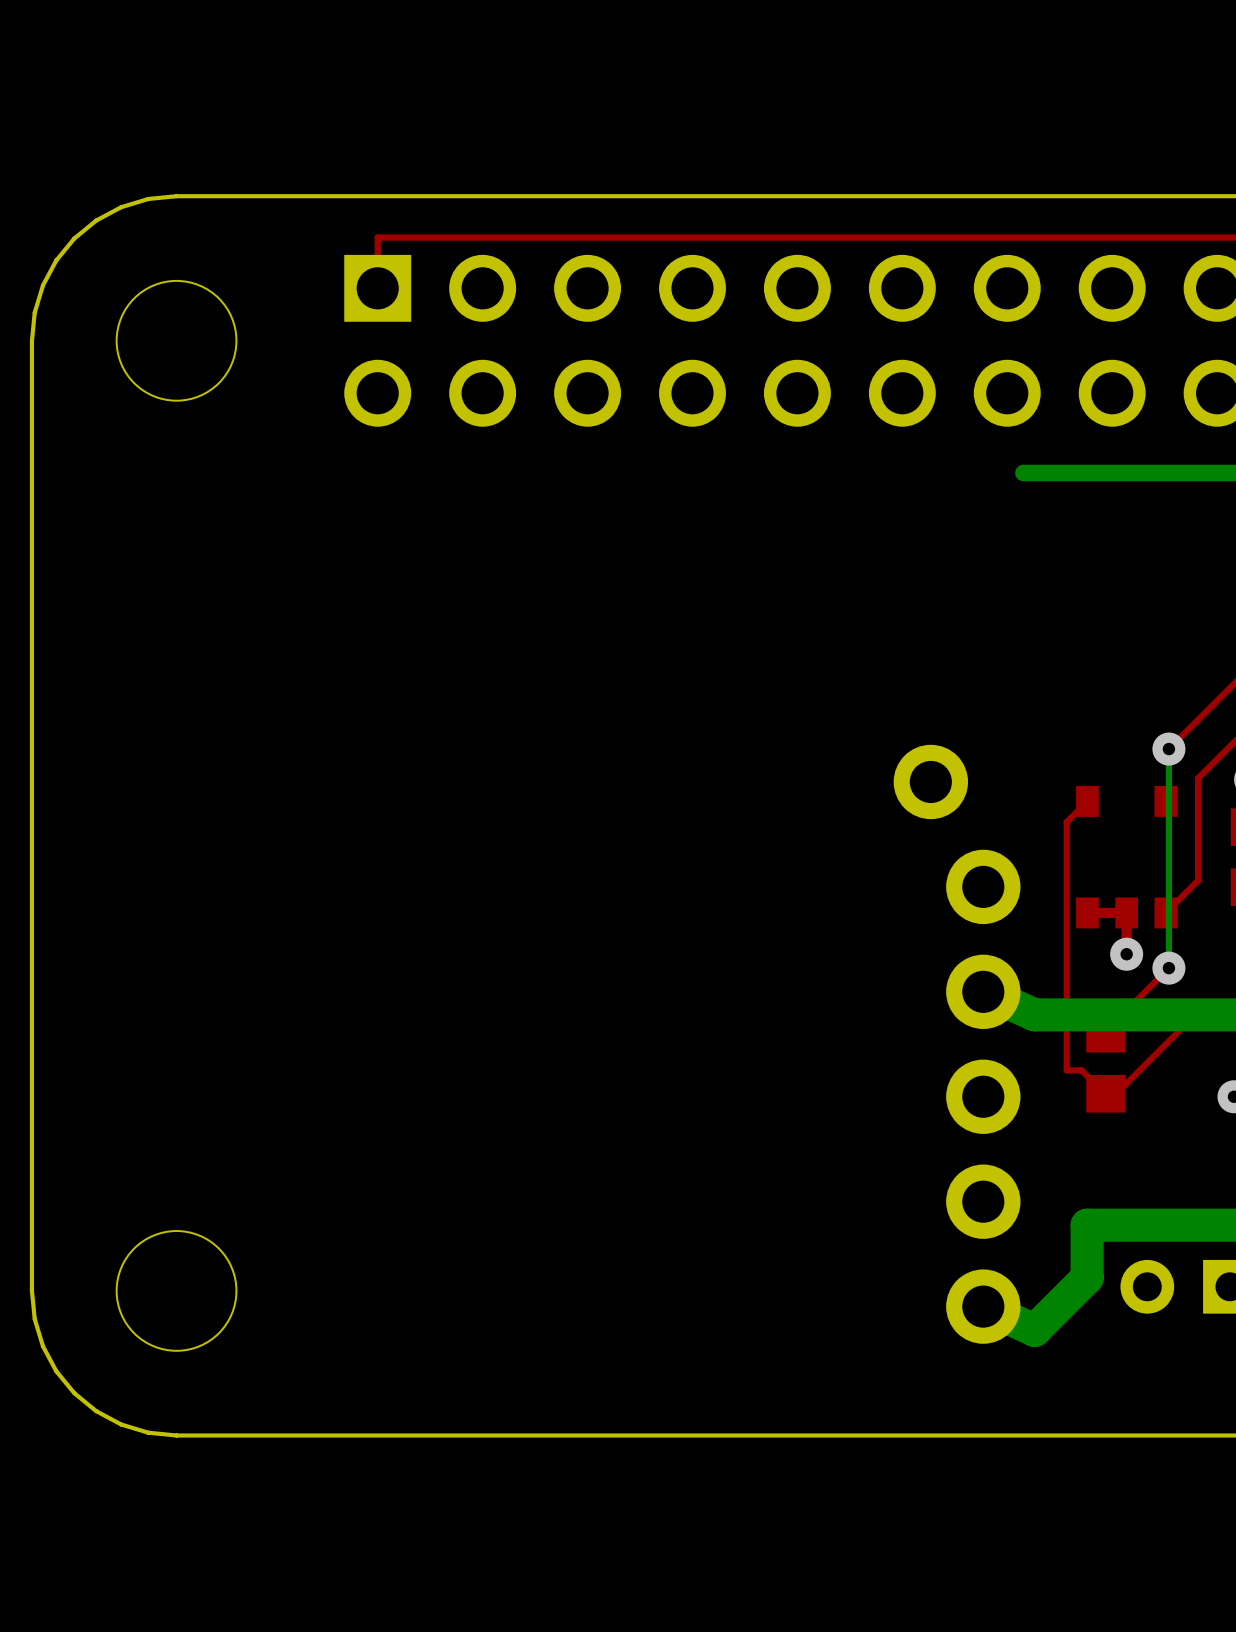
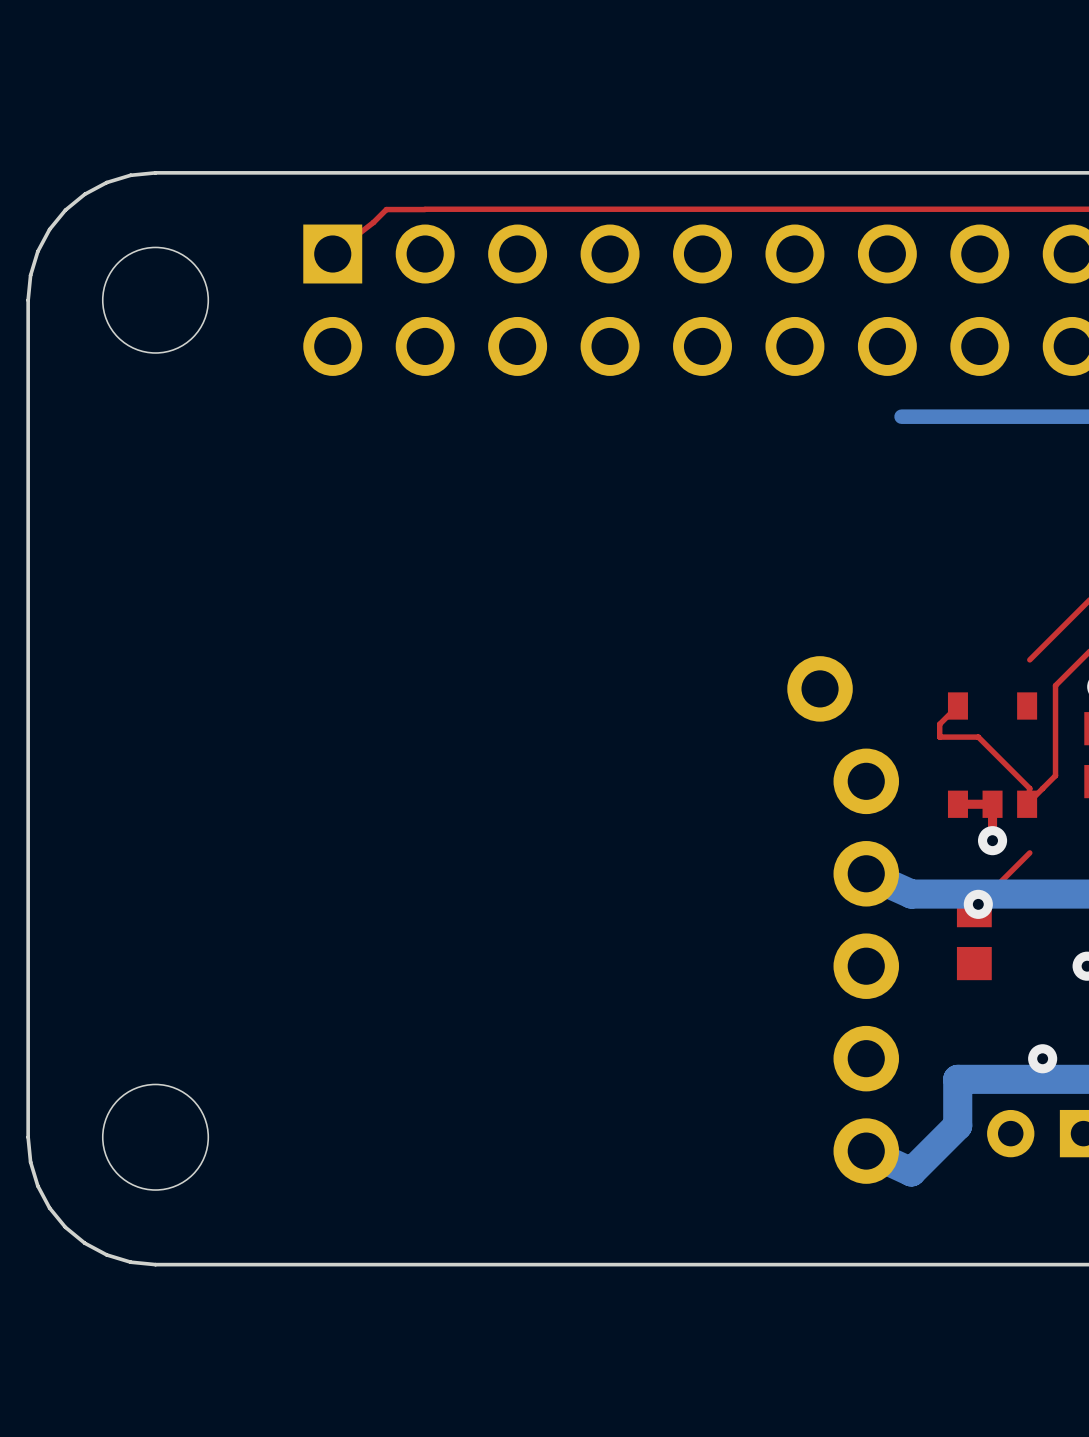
top track: (482, 237) (377, 237) (377, 288) -> (425, 209) (386, 209) (373, 222) (332, 254)
bottom track: (1168, 749) (1168, 968) -> none
via: (1168, 749) -> none
top track: (1066, 836) (1066, 1070) (1081, 1070) (1106, 1093) (1125, 1084) (1183, 1026) -> (939, 737) (978, 737) (1029, 788) (1027, 804)
via position: (1168, 968) -> (978, 904)
via: none -> (1042, 1058)

